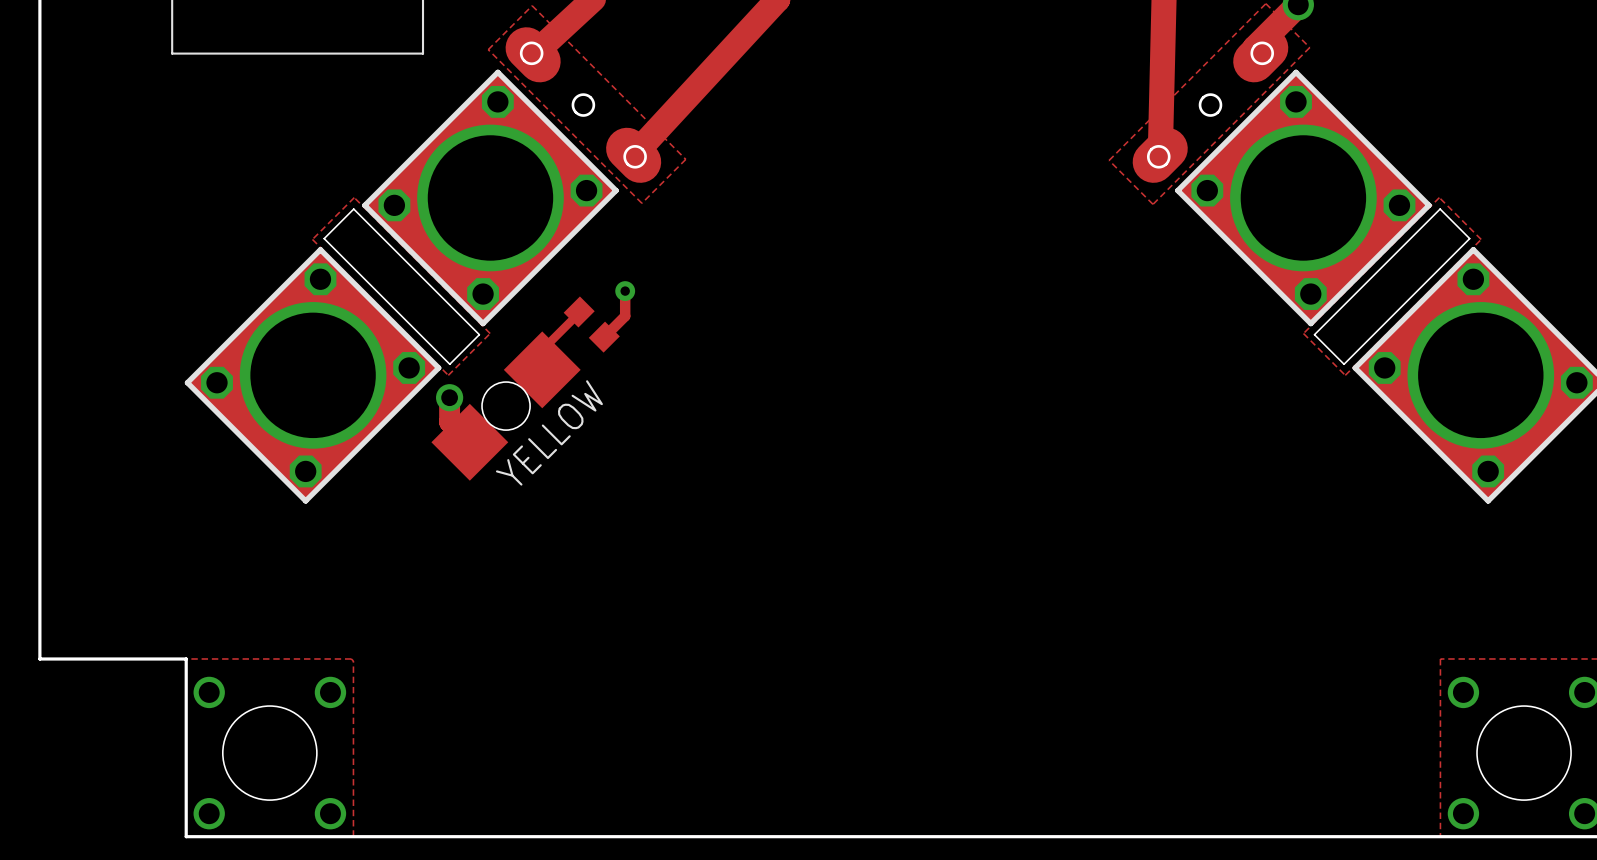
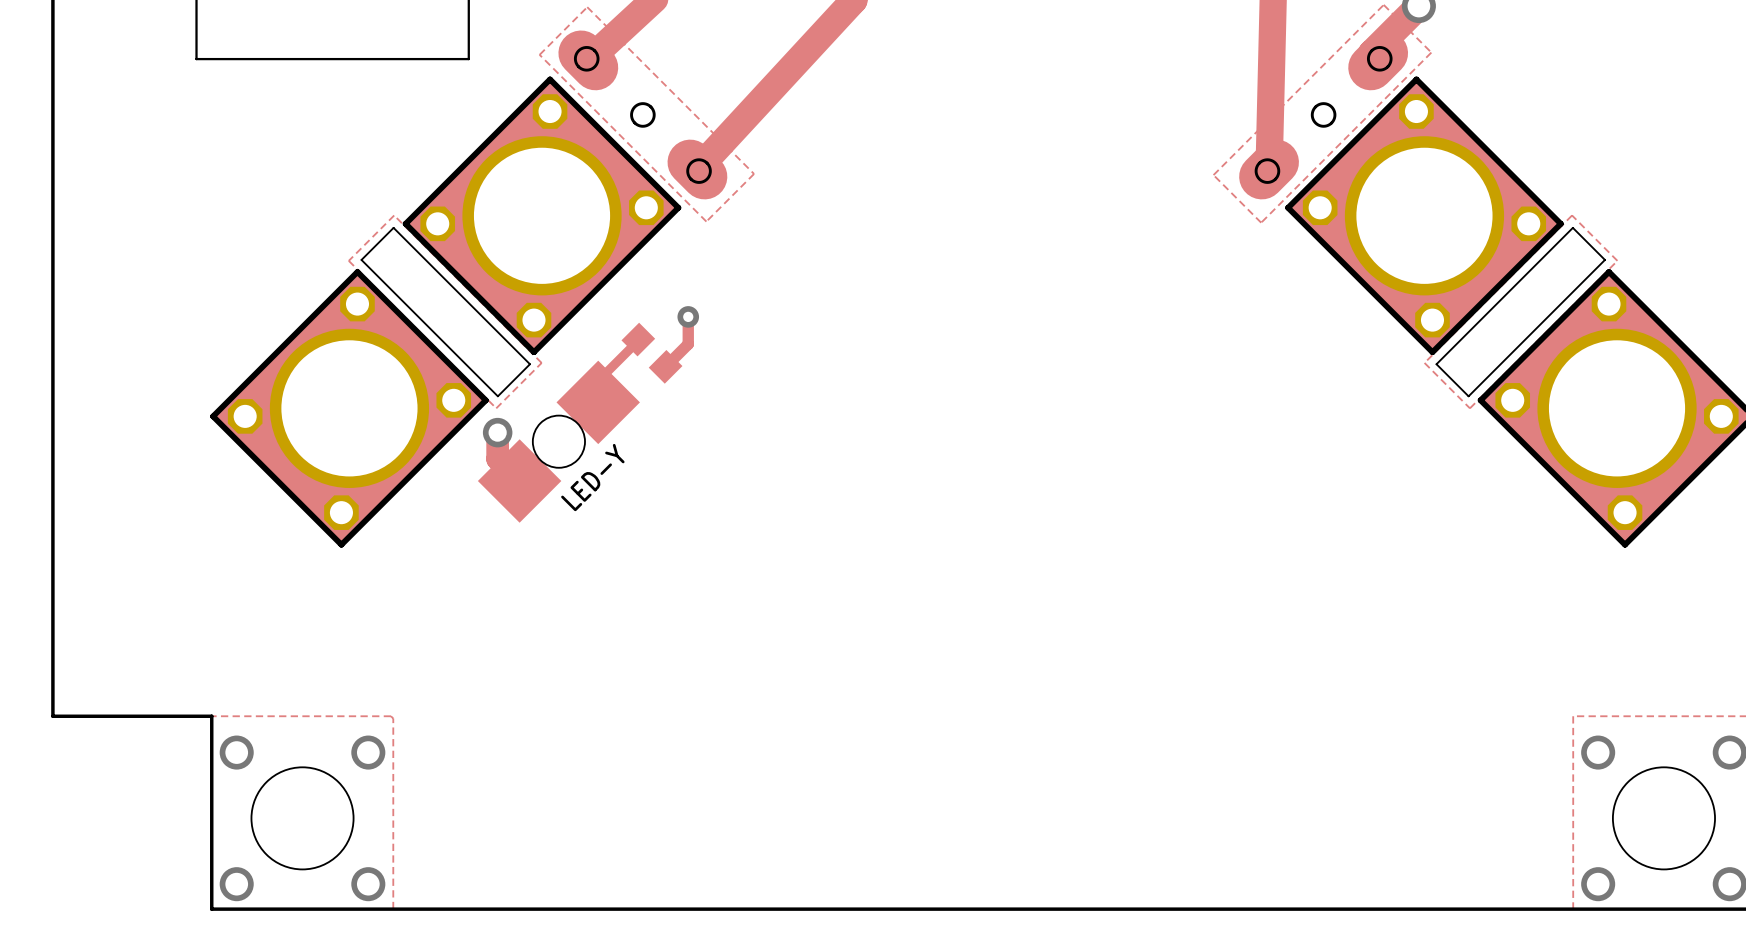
YELLOW name: YELLOW (549, 432) -> LED-Y (592, 477)

